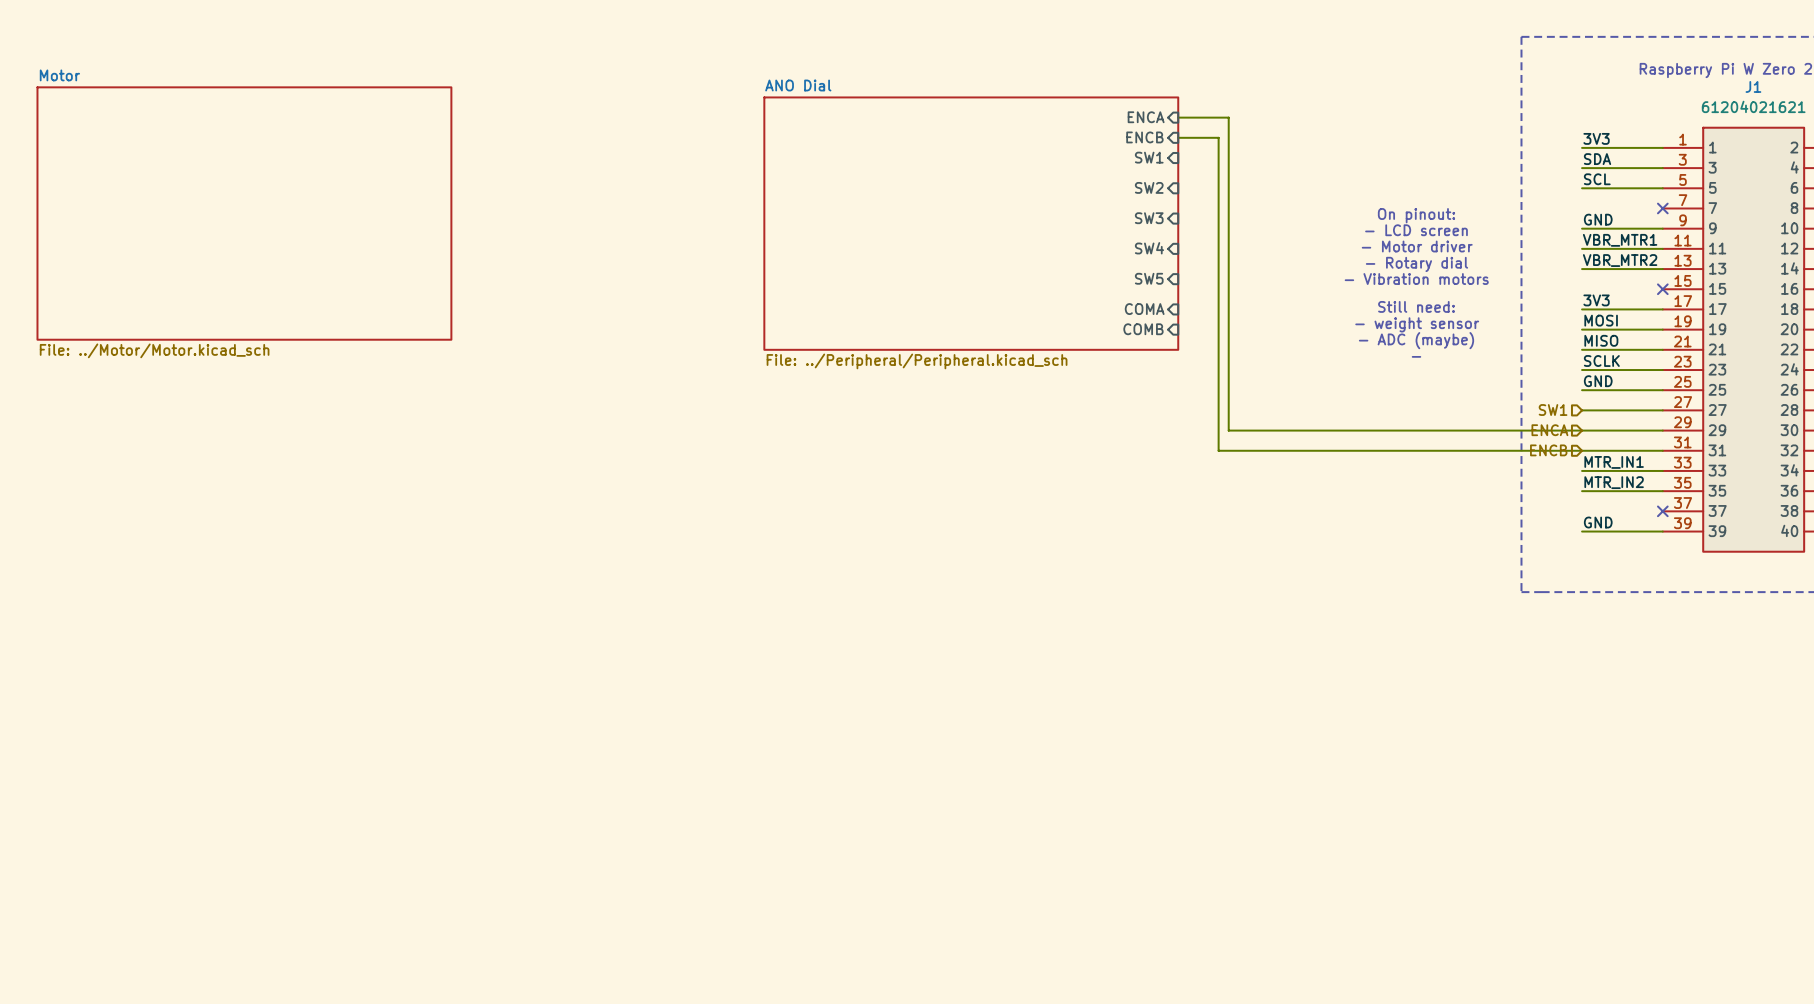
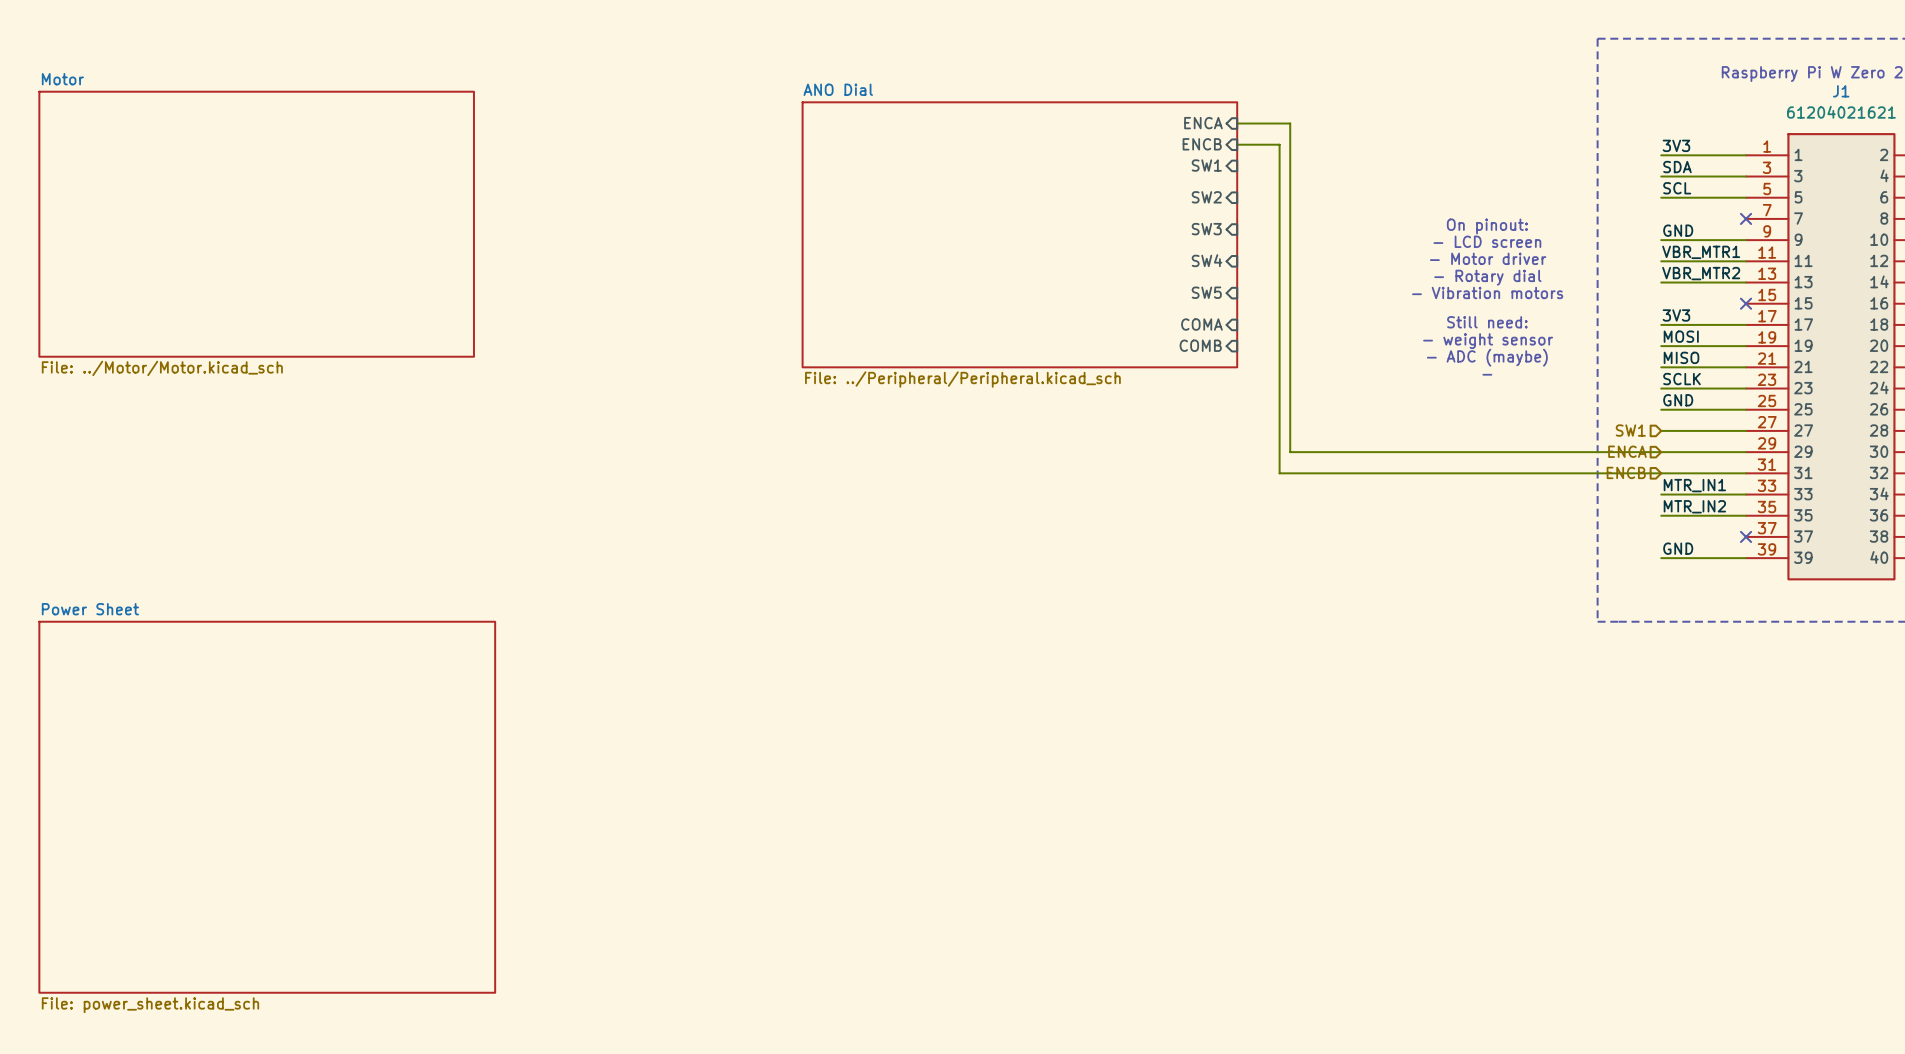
sheet Power Sheet: none -> File: power_sheet.kicad_sch (267, 807)

